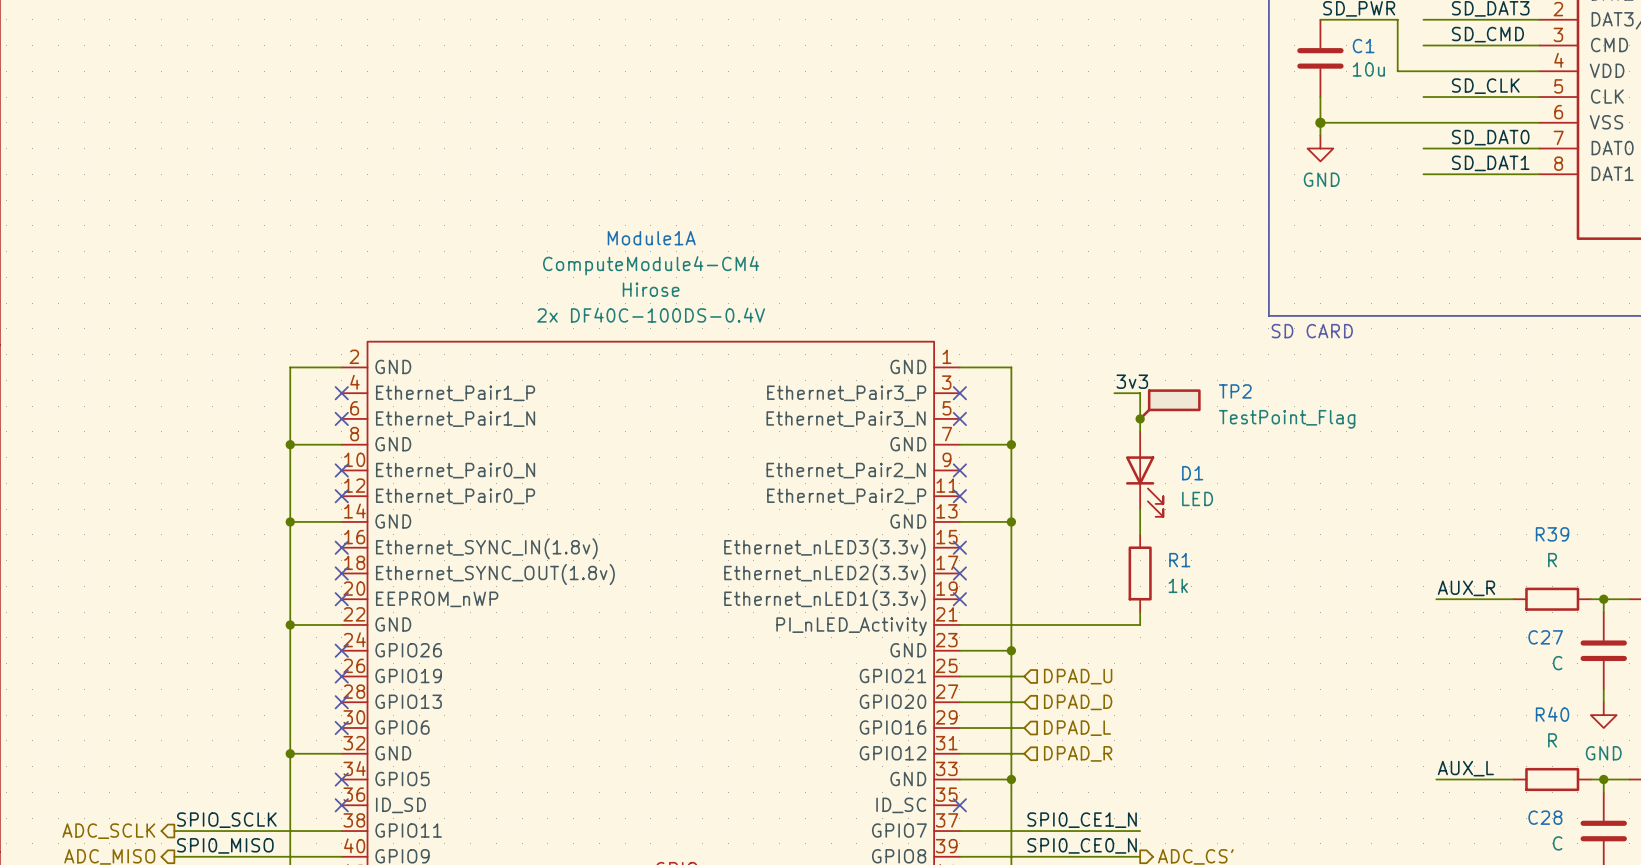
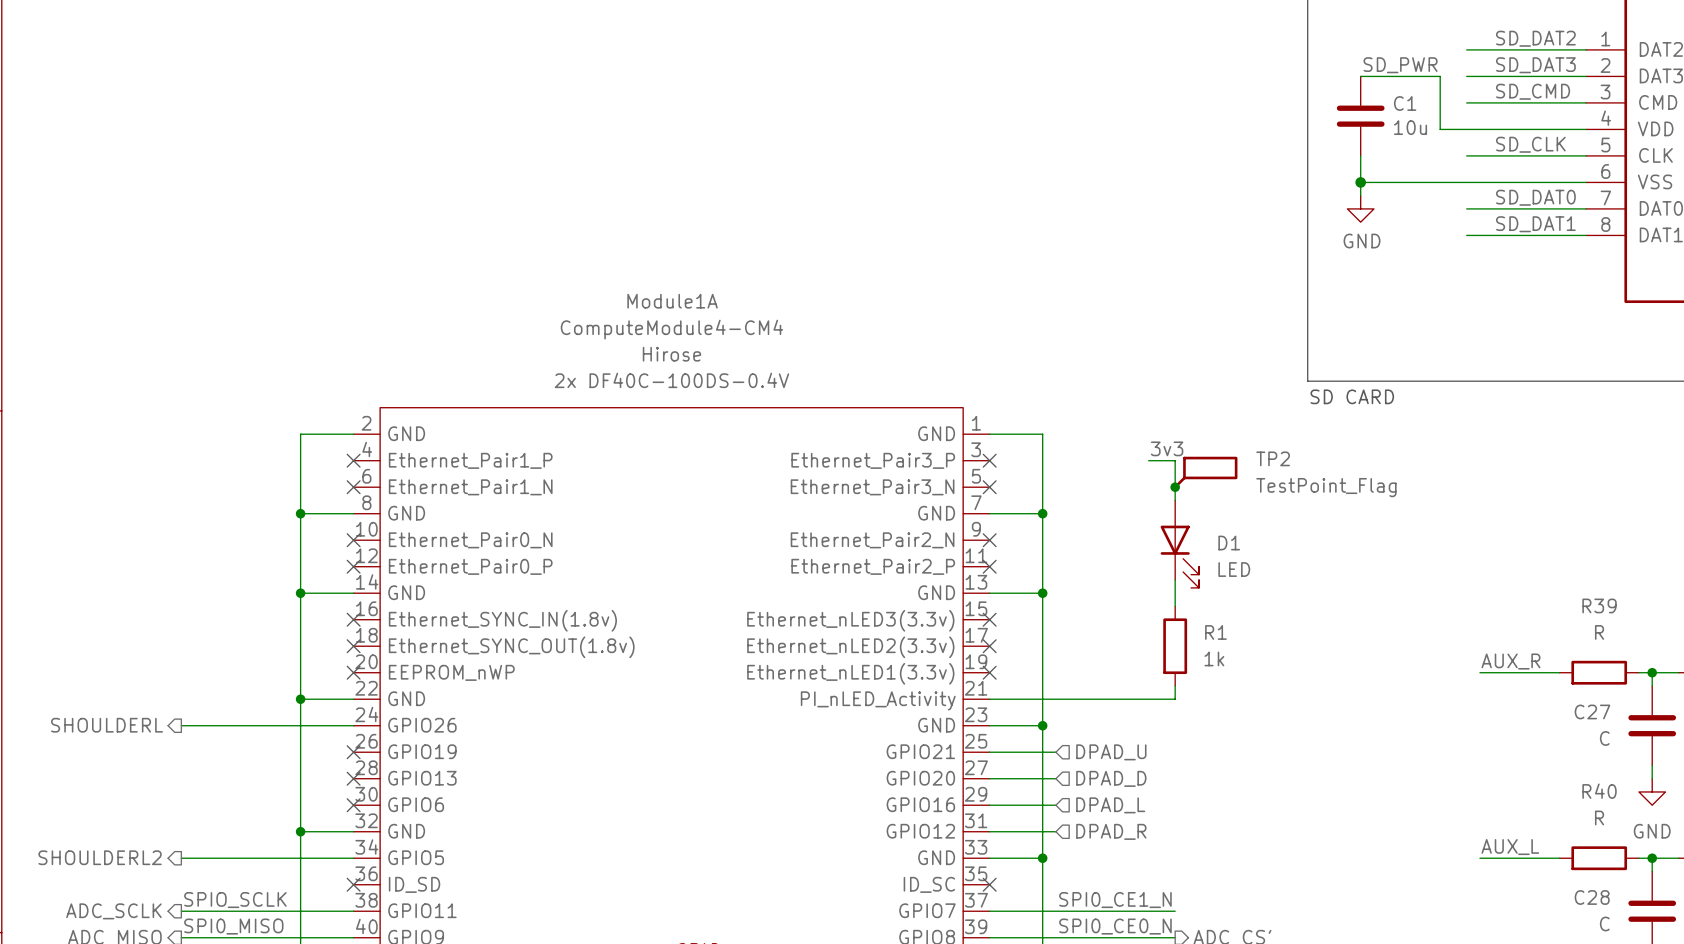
hierarchical label: none -> SHOULDERL (107, 725)
wire: none -> (181, 725) (353, 725)
no-connect mark: (341, 650) -> none
hierarchical label: none -> SHOULDERL2 (100, 857)
wire: none -> (181, 858) (353, 858)
no-connect mark: (341, 779) -> none

